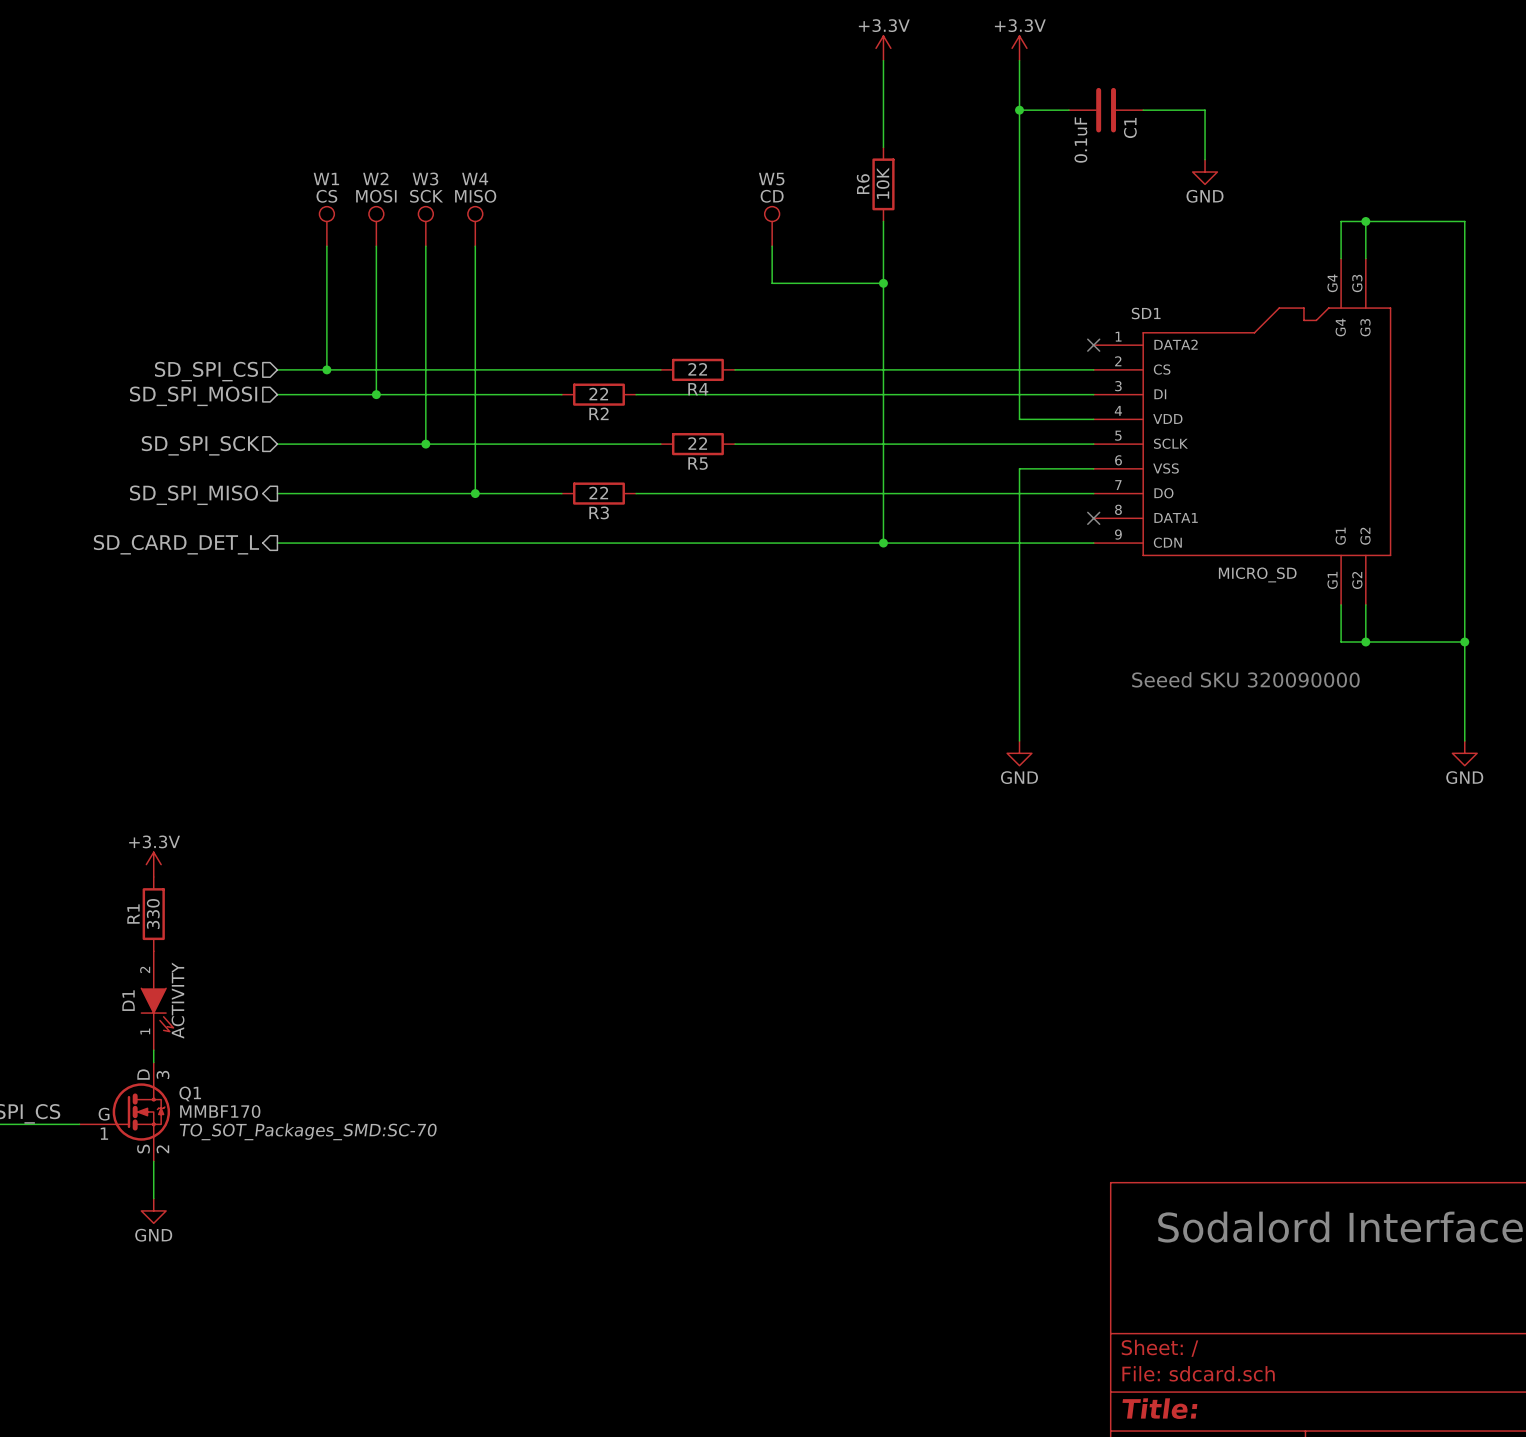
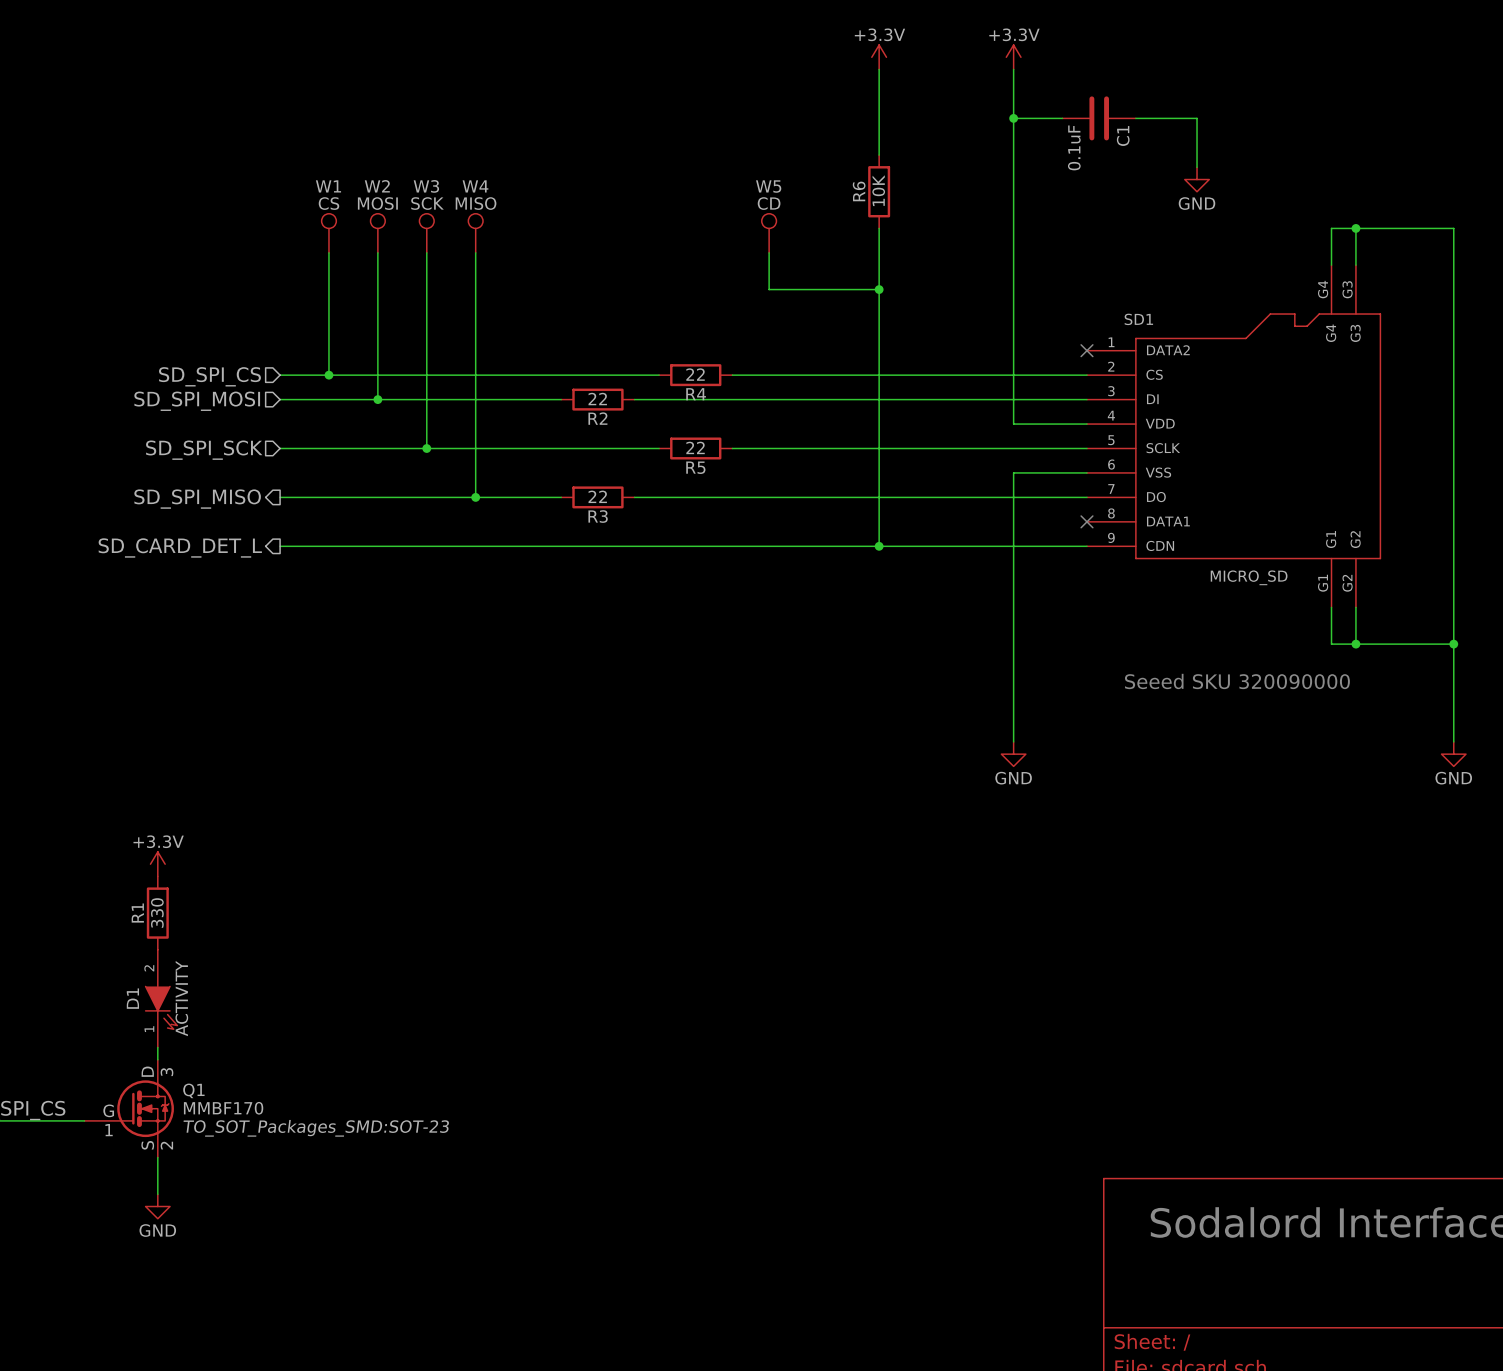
Q1 text: TO_SOT_Packages_SMD:SC-70 (308, 1131) -> TO_SOT_Packages_SMD:SOT-23 (316, 1128)

